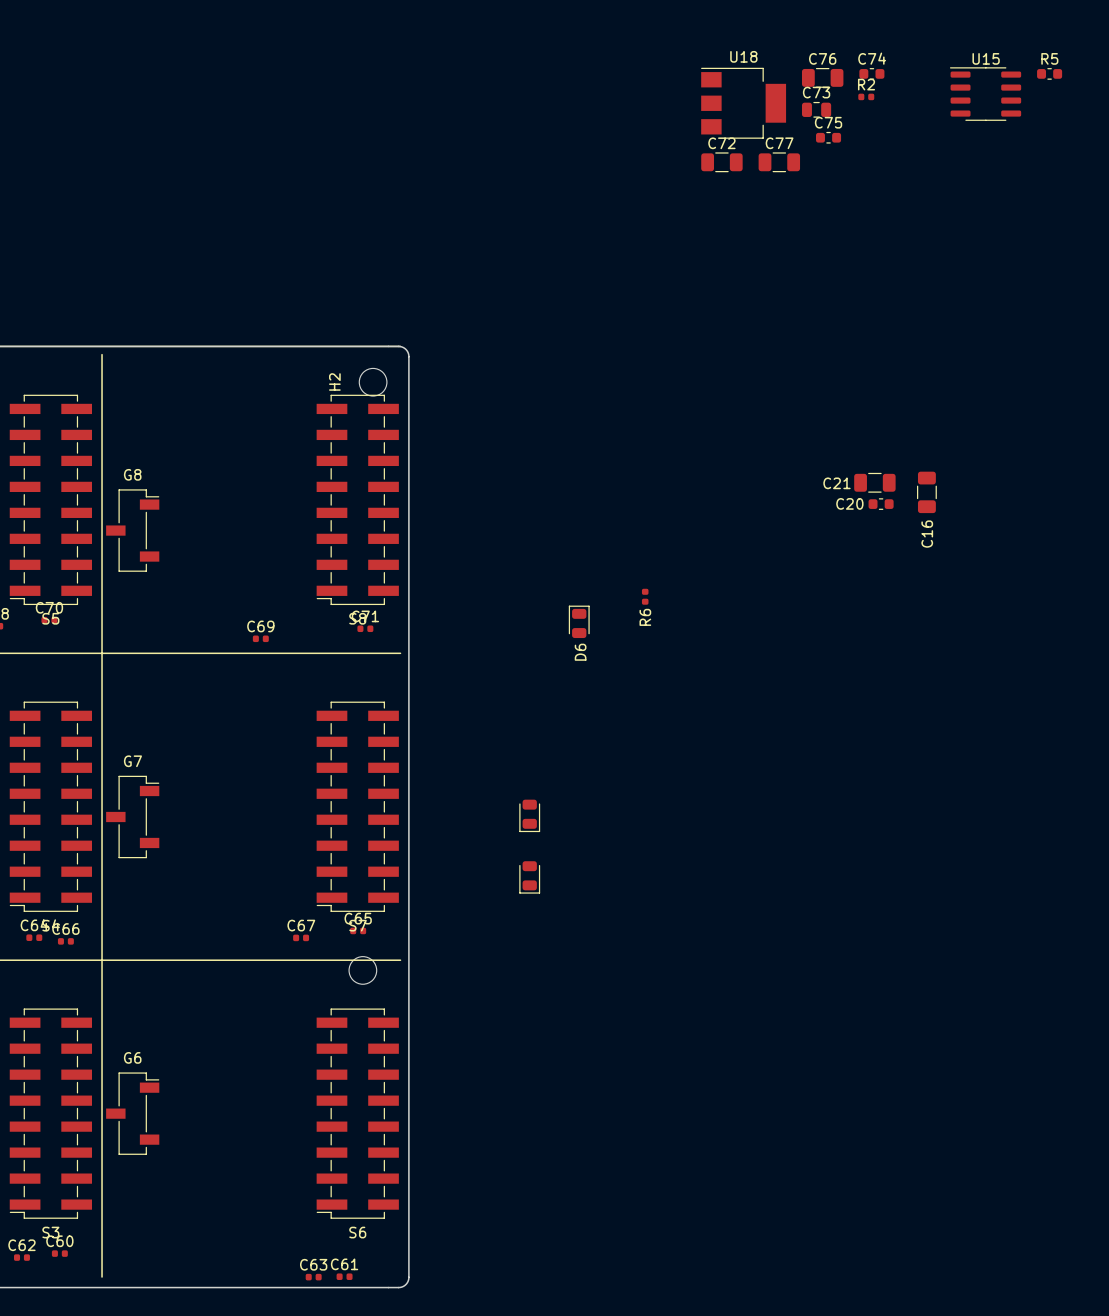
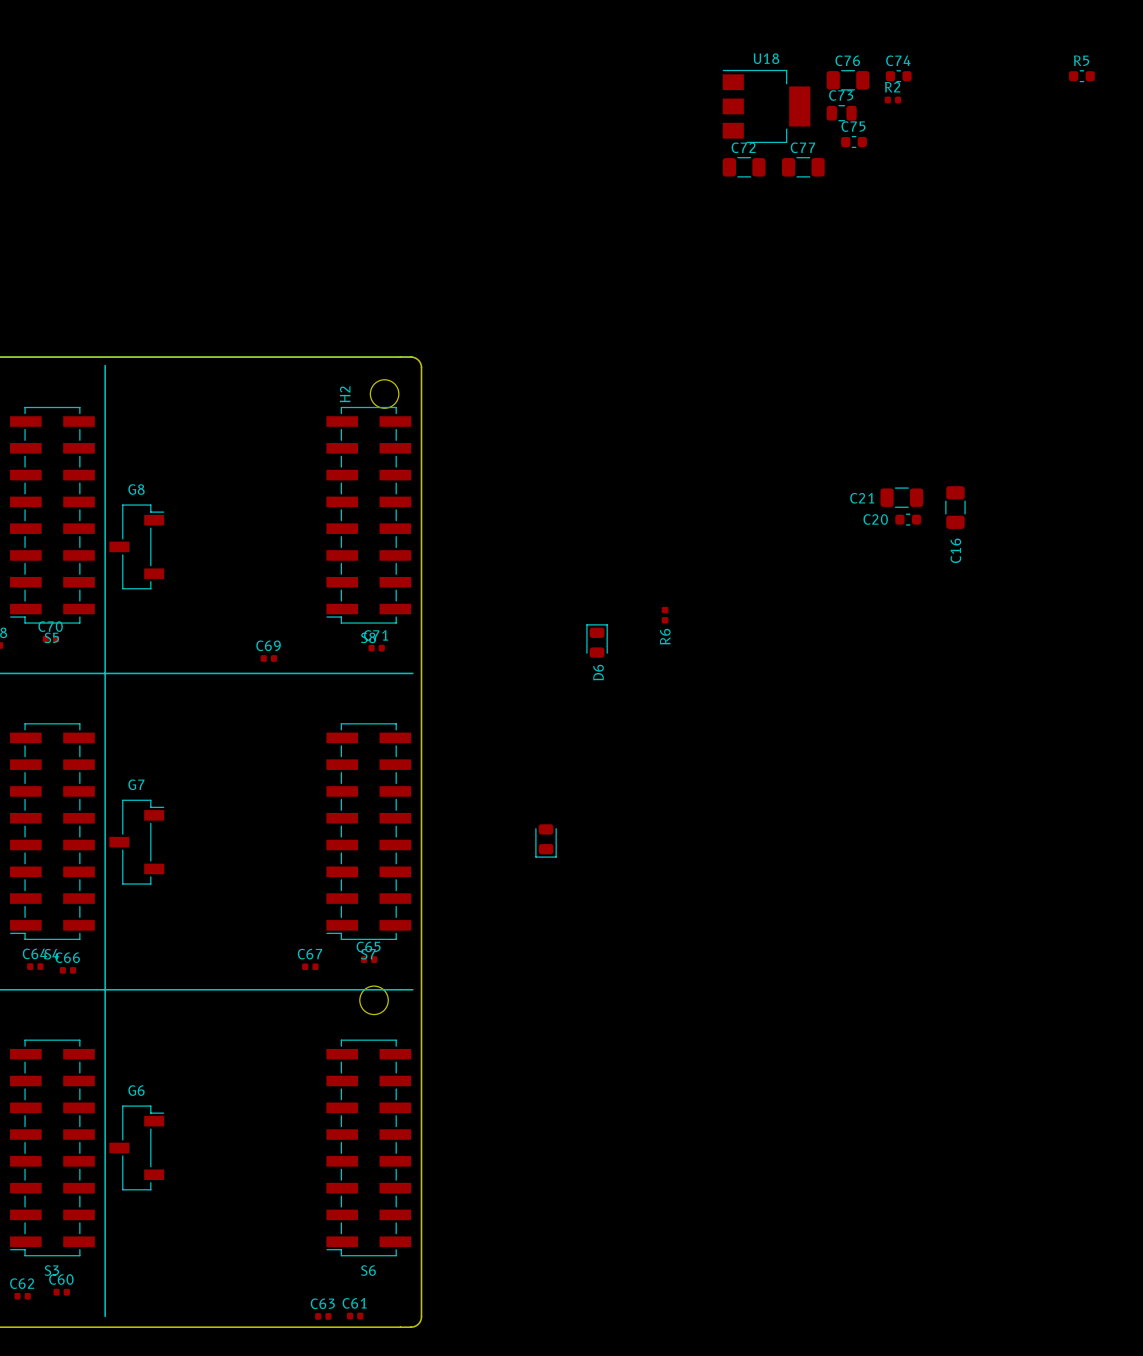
U15: (985, 94) -> none
part: (529, 877) -> none

